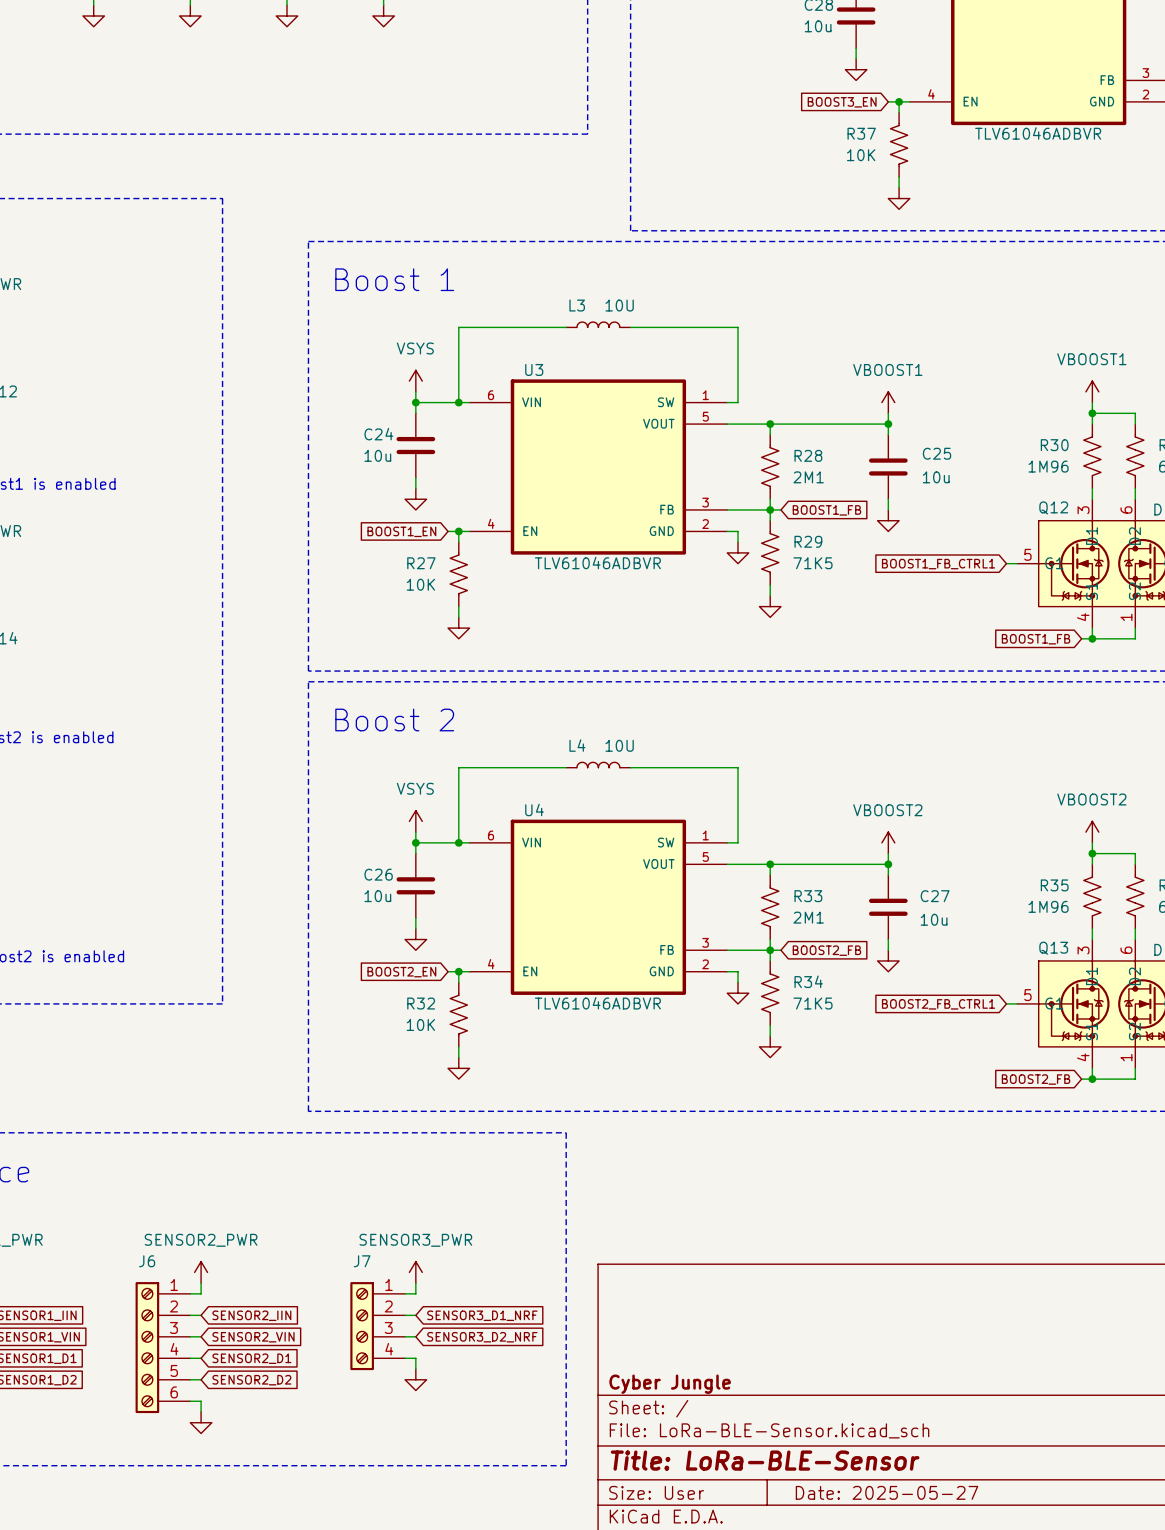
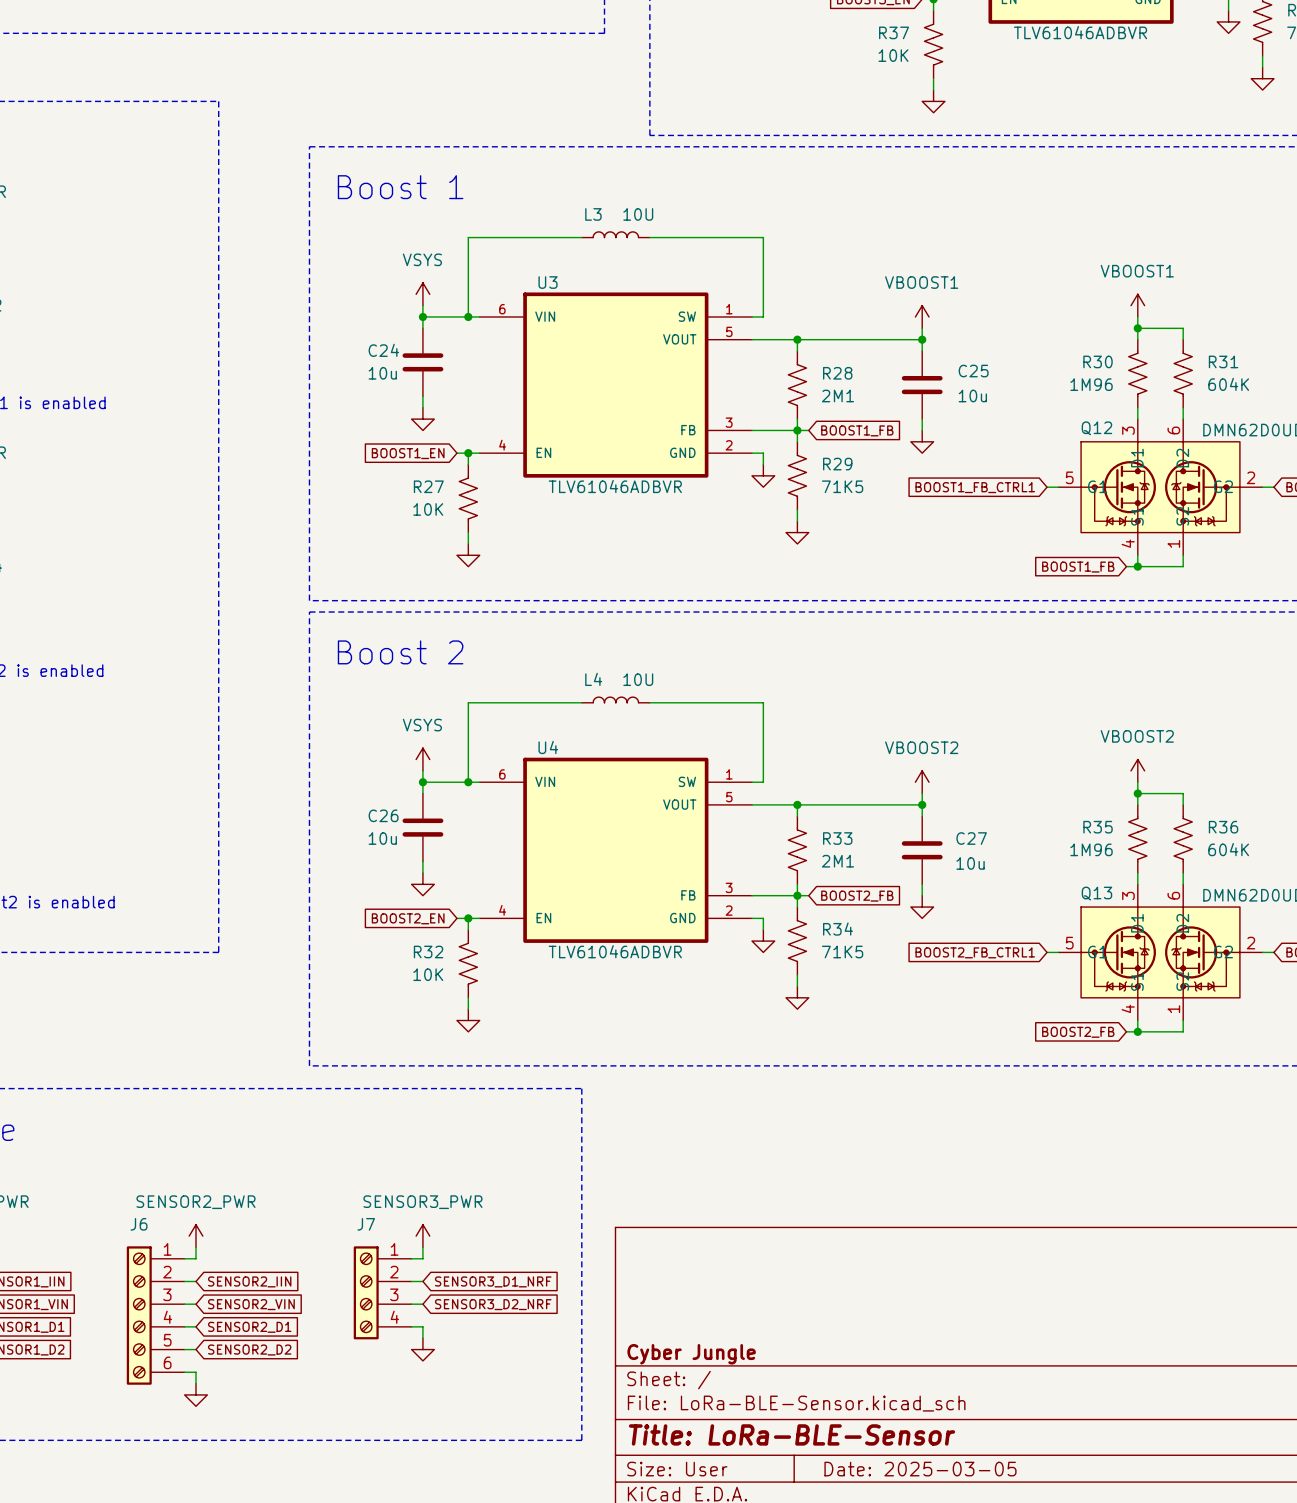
title block: Date: 2025-05-27 (887, 1492) -> Date: 2025-03-05 (920, 1469)

